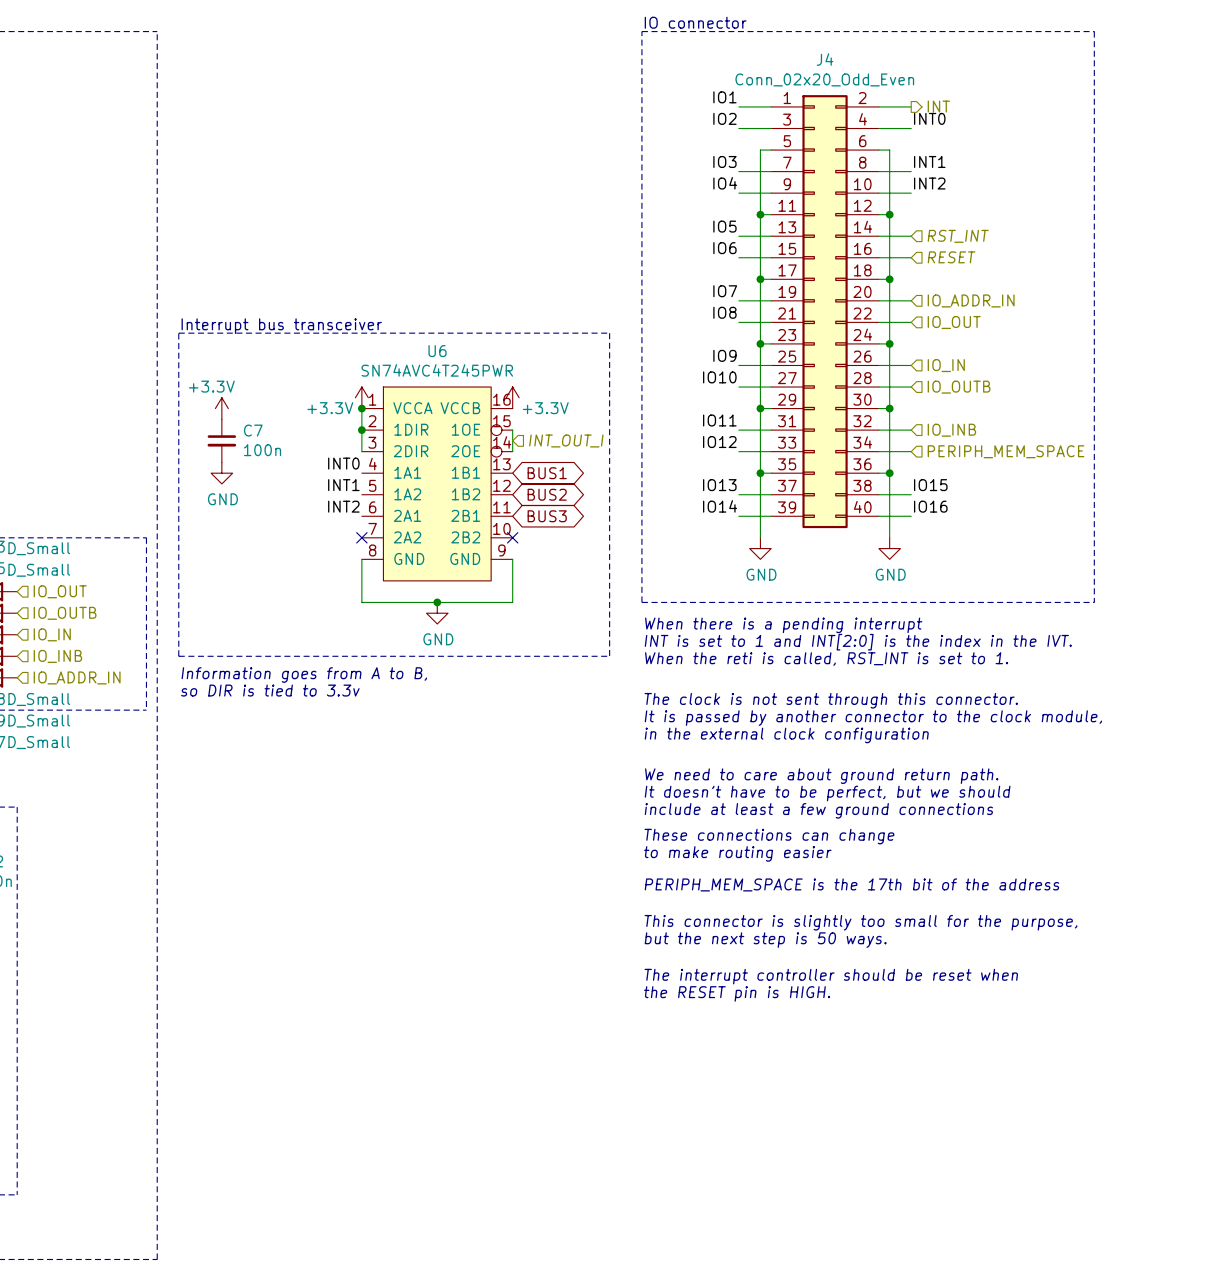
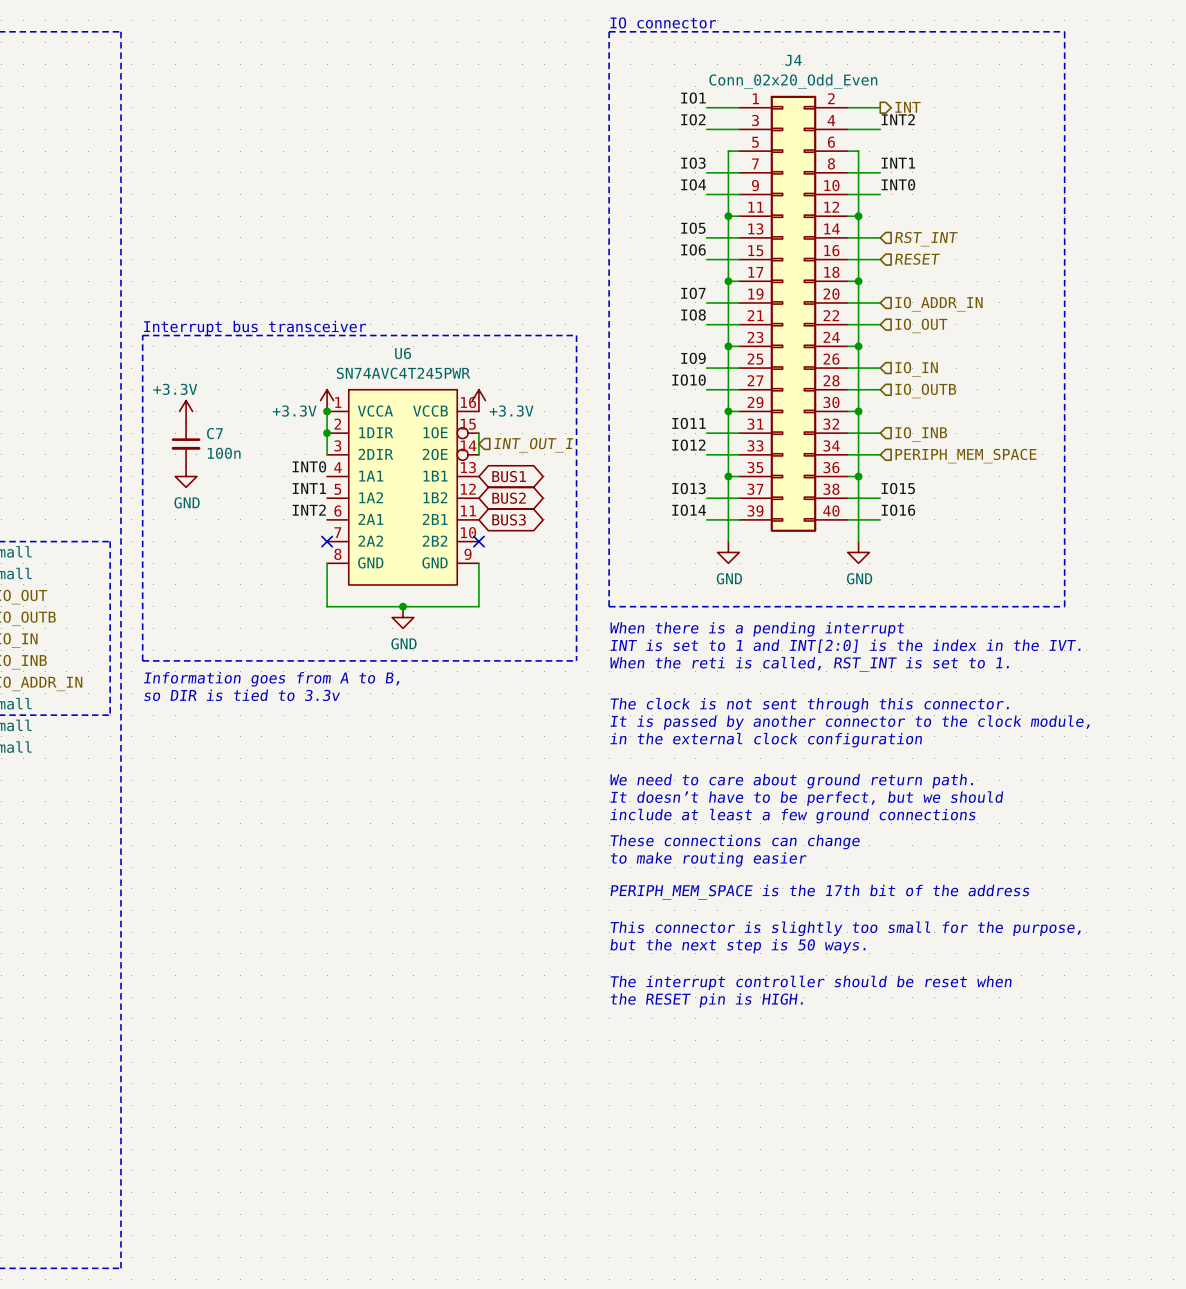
label: INT0 (929, 118) -> INT2 (898, 119)
label: INT2 (929, 183) -> INT0 (898, 184)

